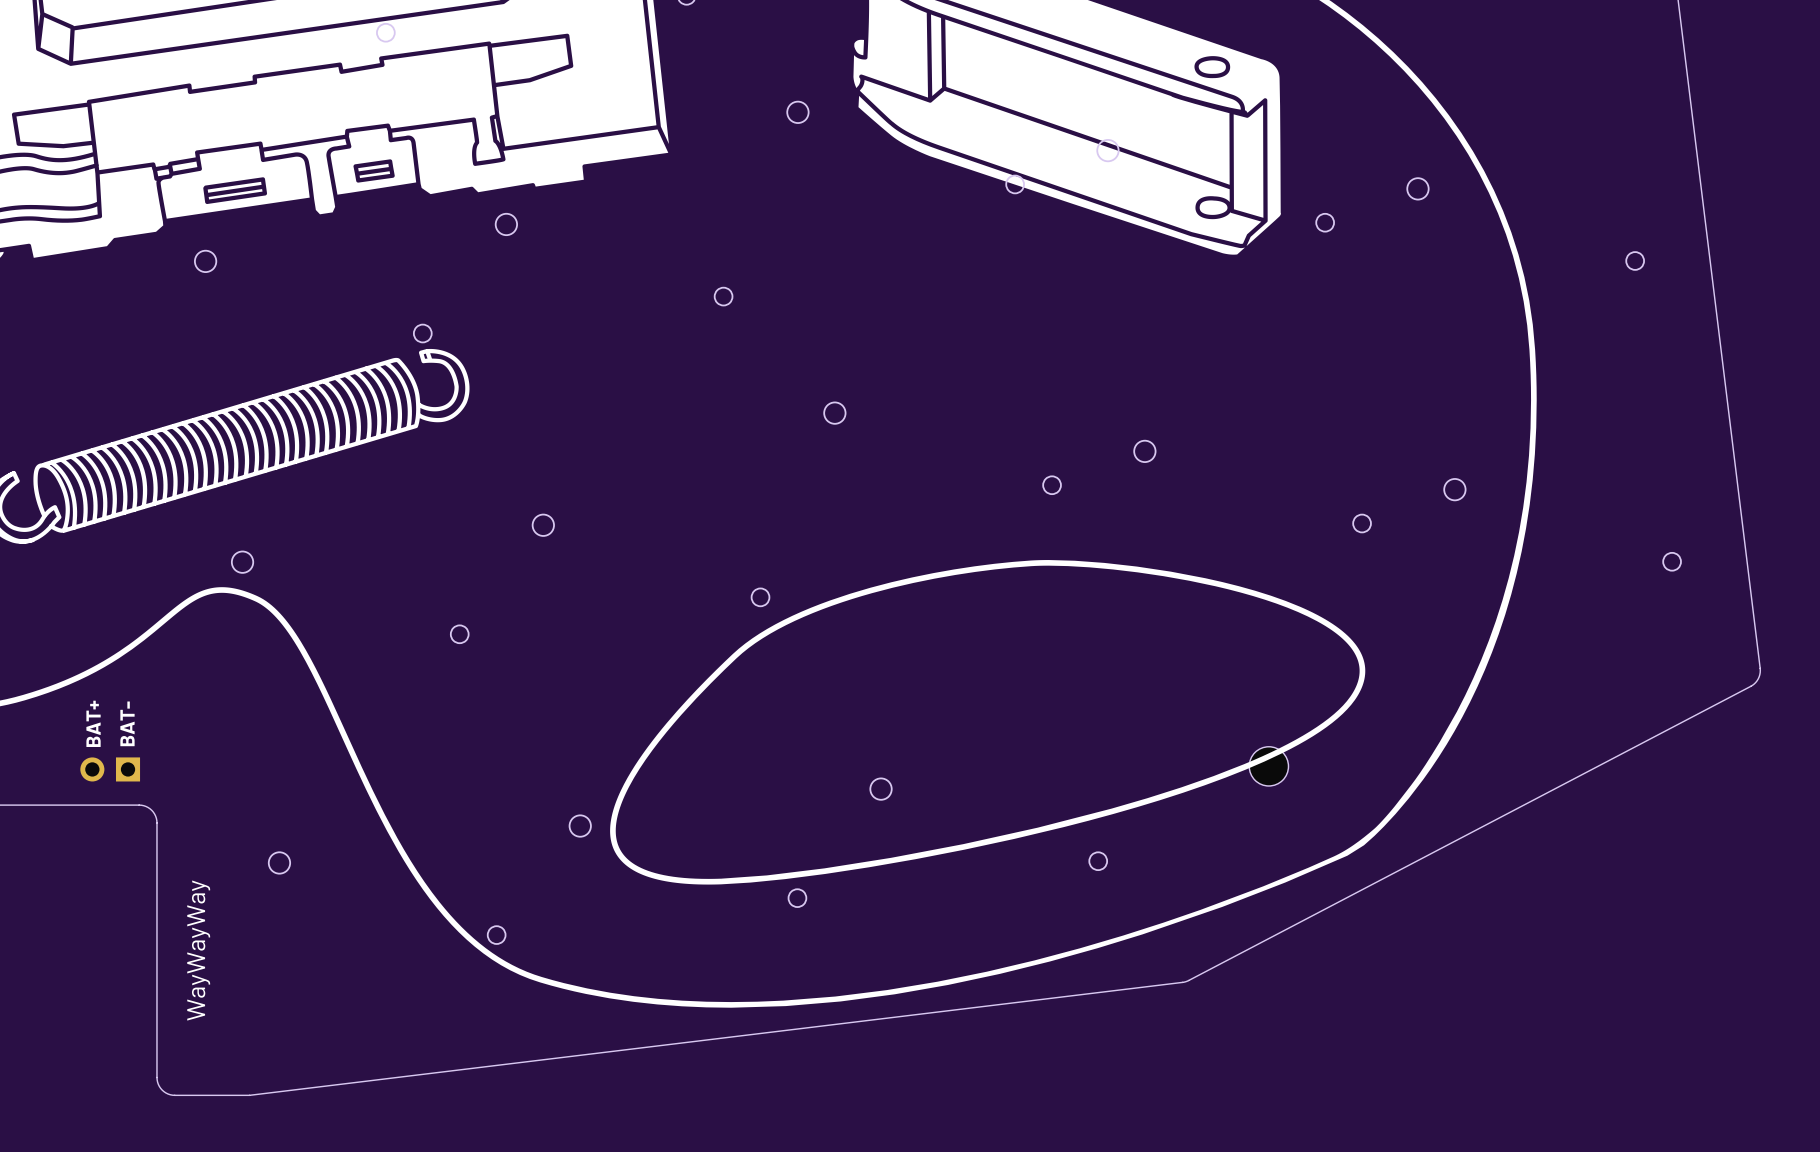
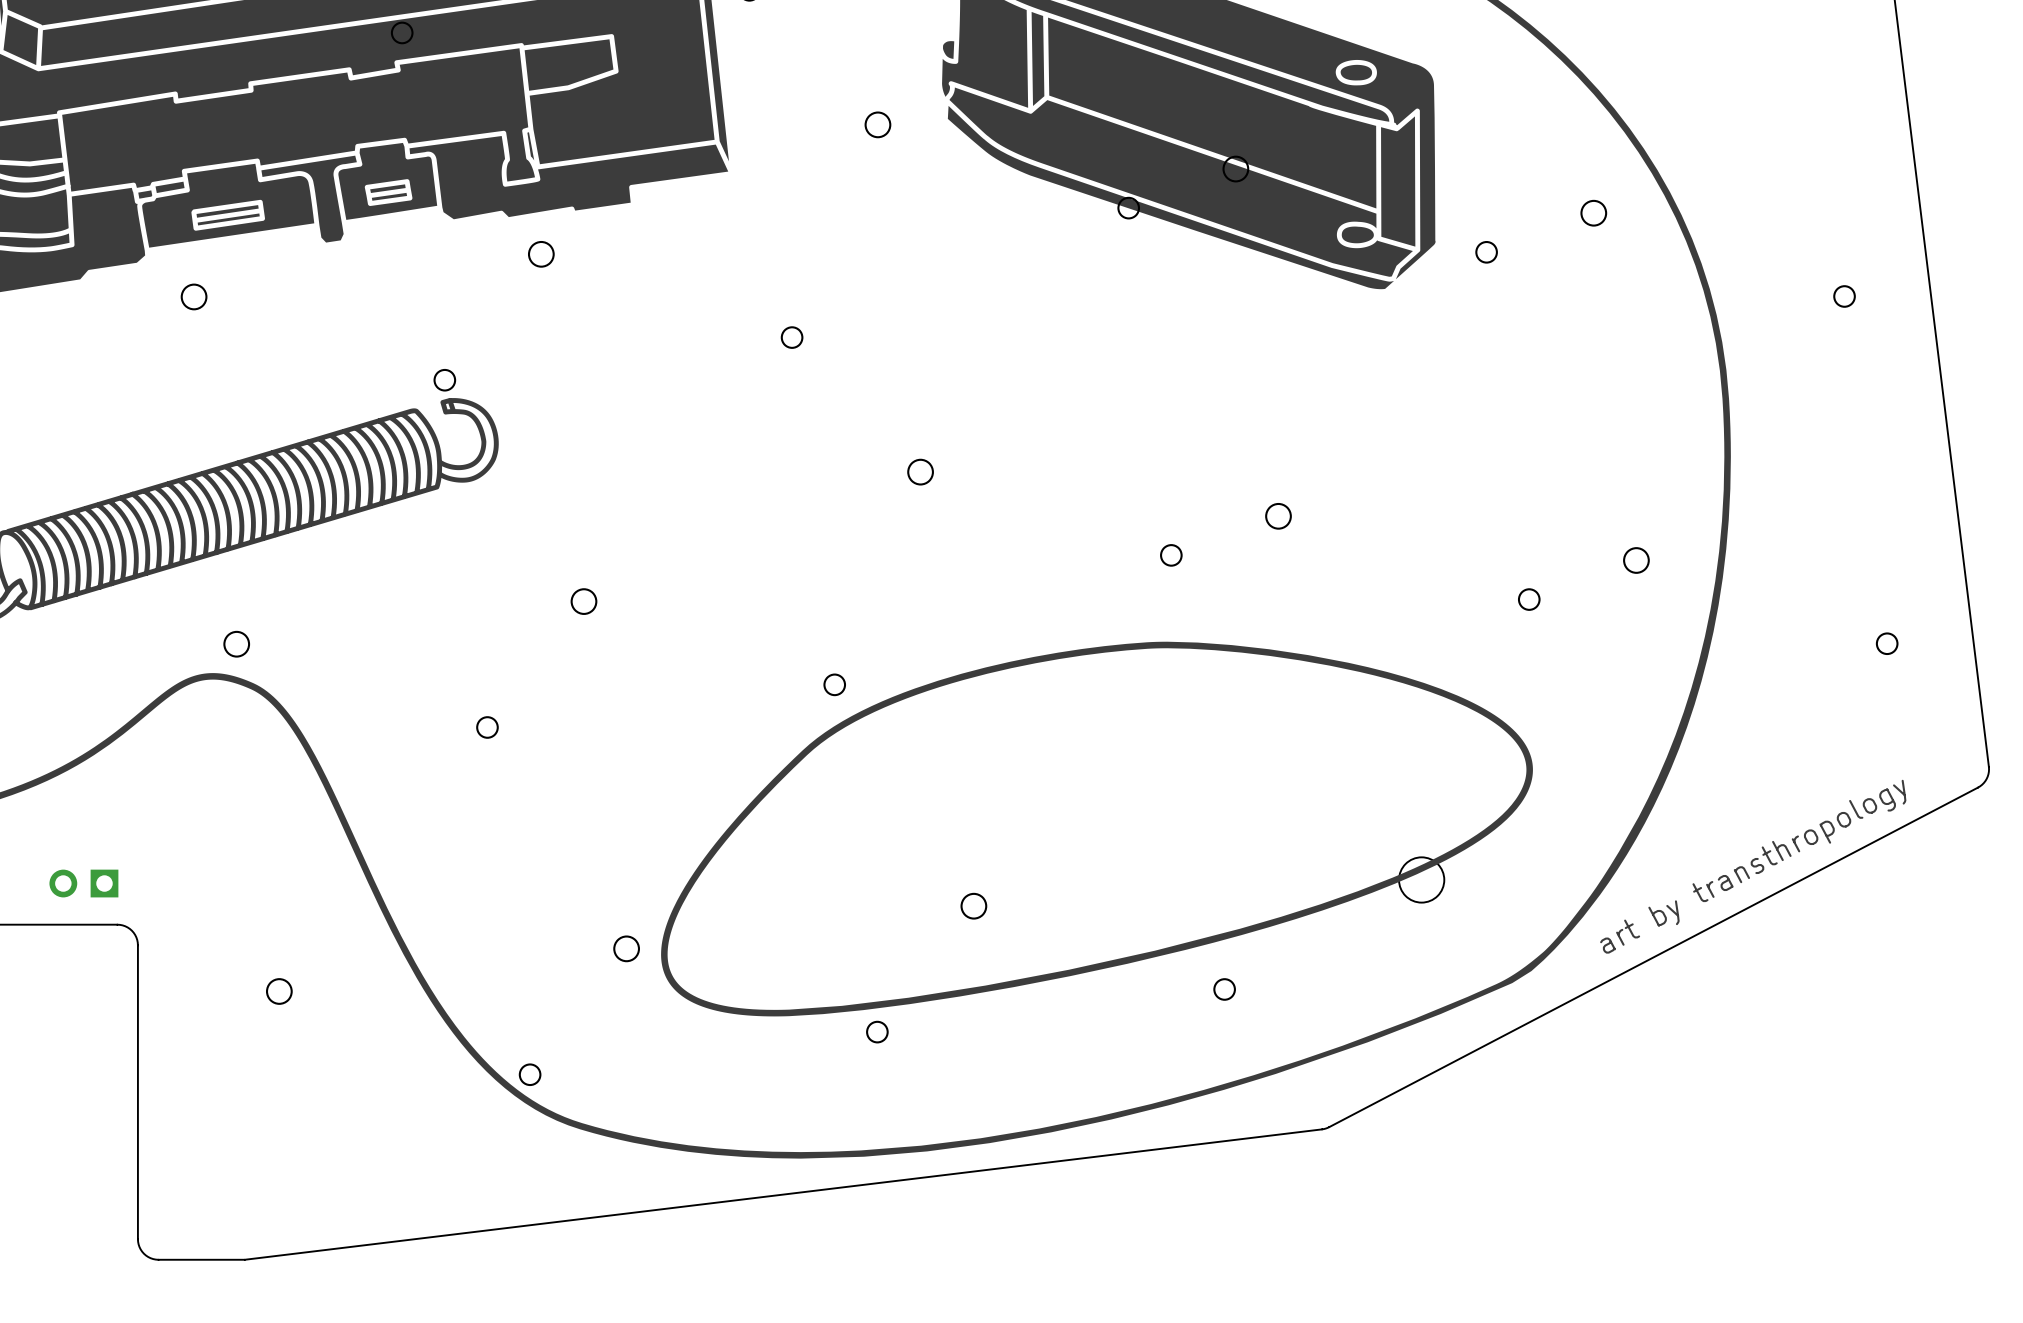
text: BAT+ (93, 723) -> none
text: BAT- (127, 723) -> none
text: none -> art by transthropology (1753, 866)
text: WayWayWay (198, 950) -> none

